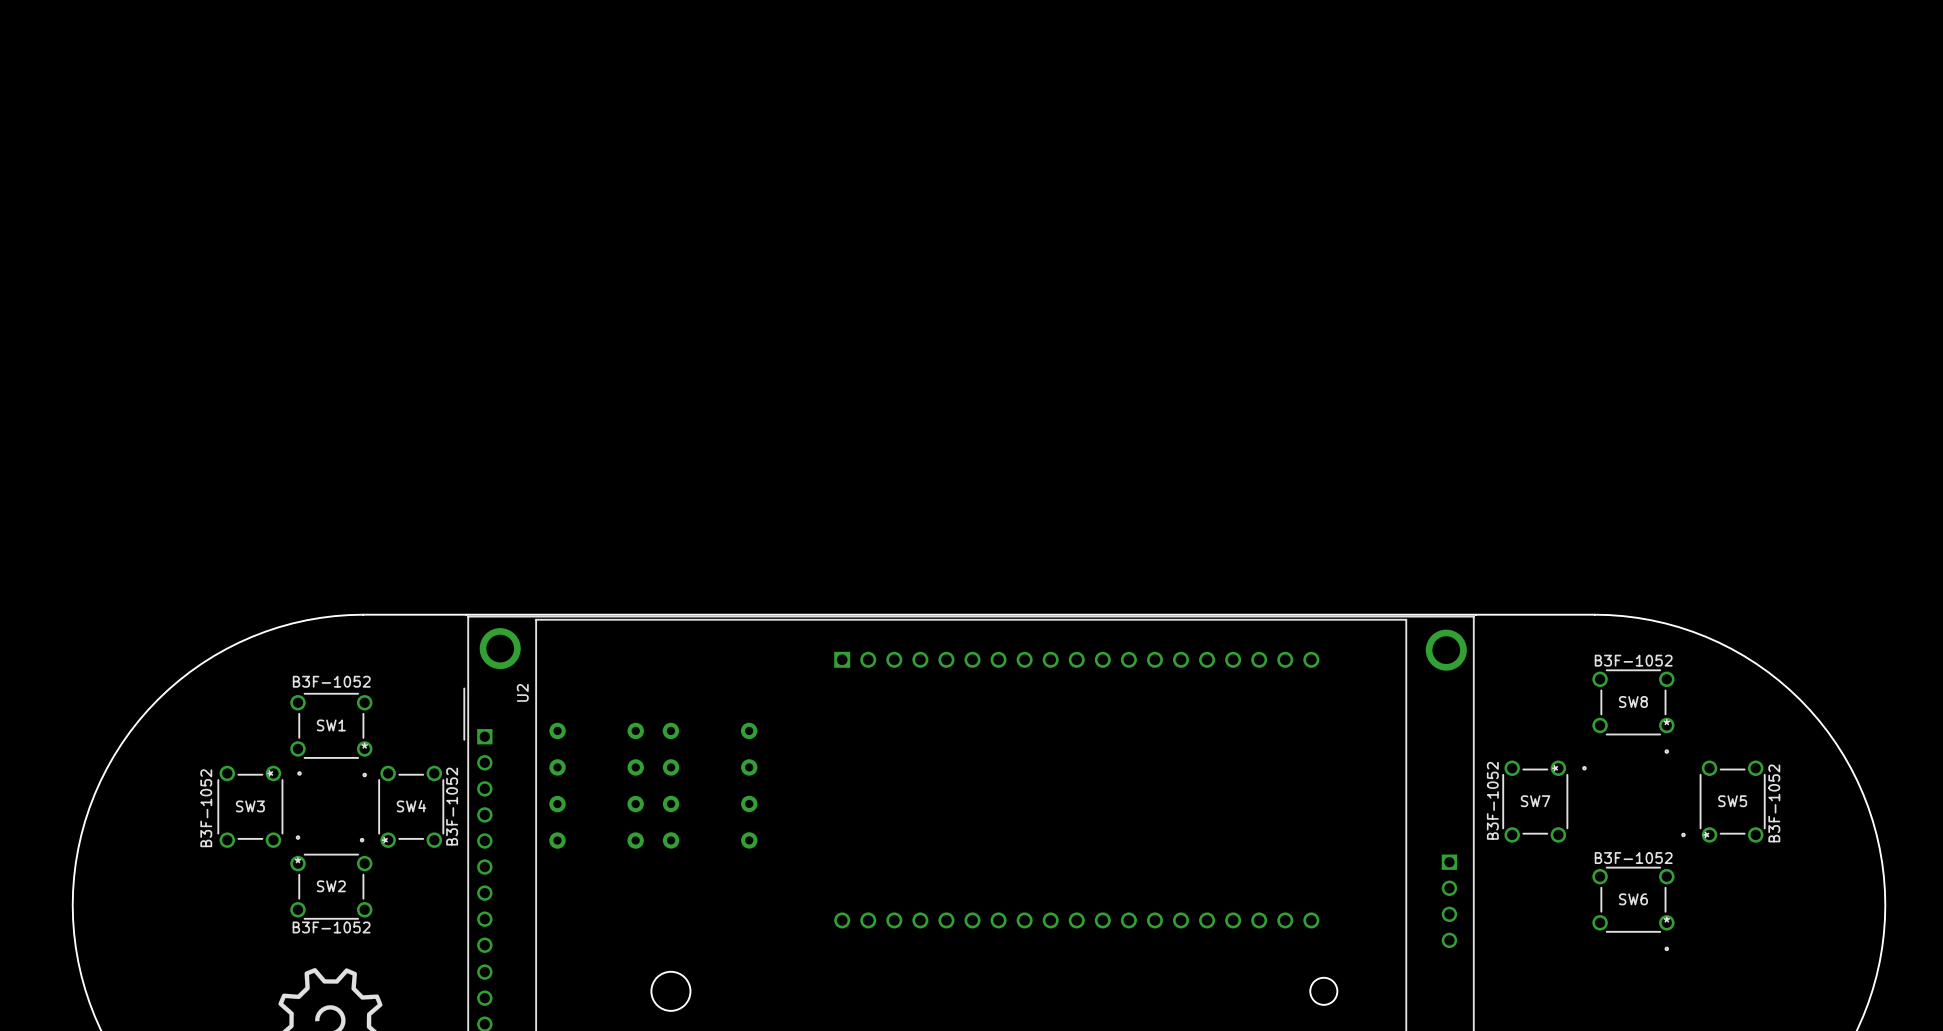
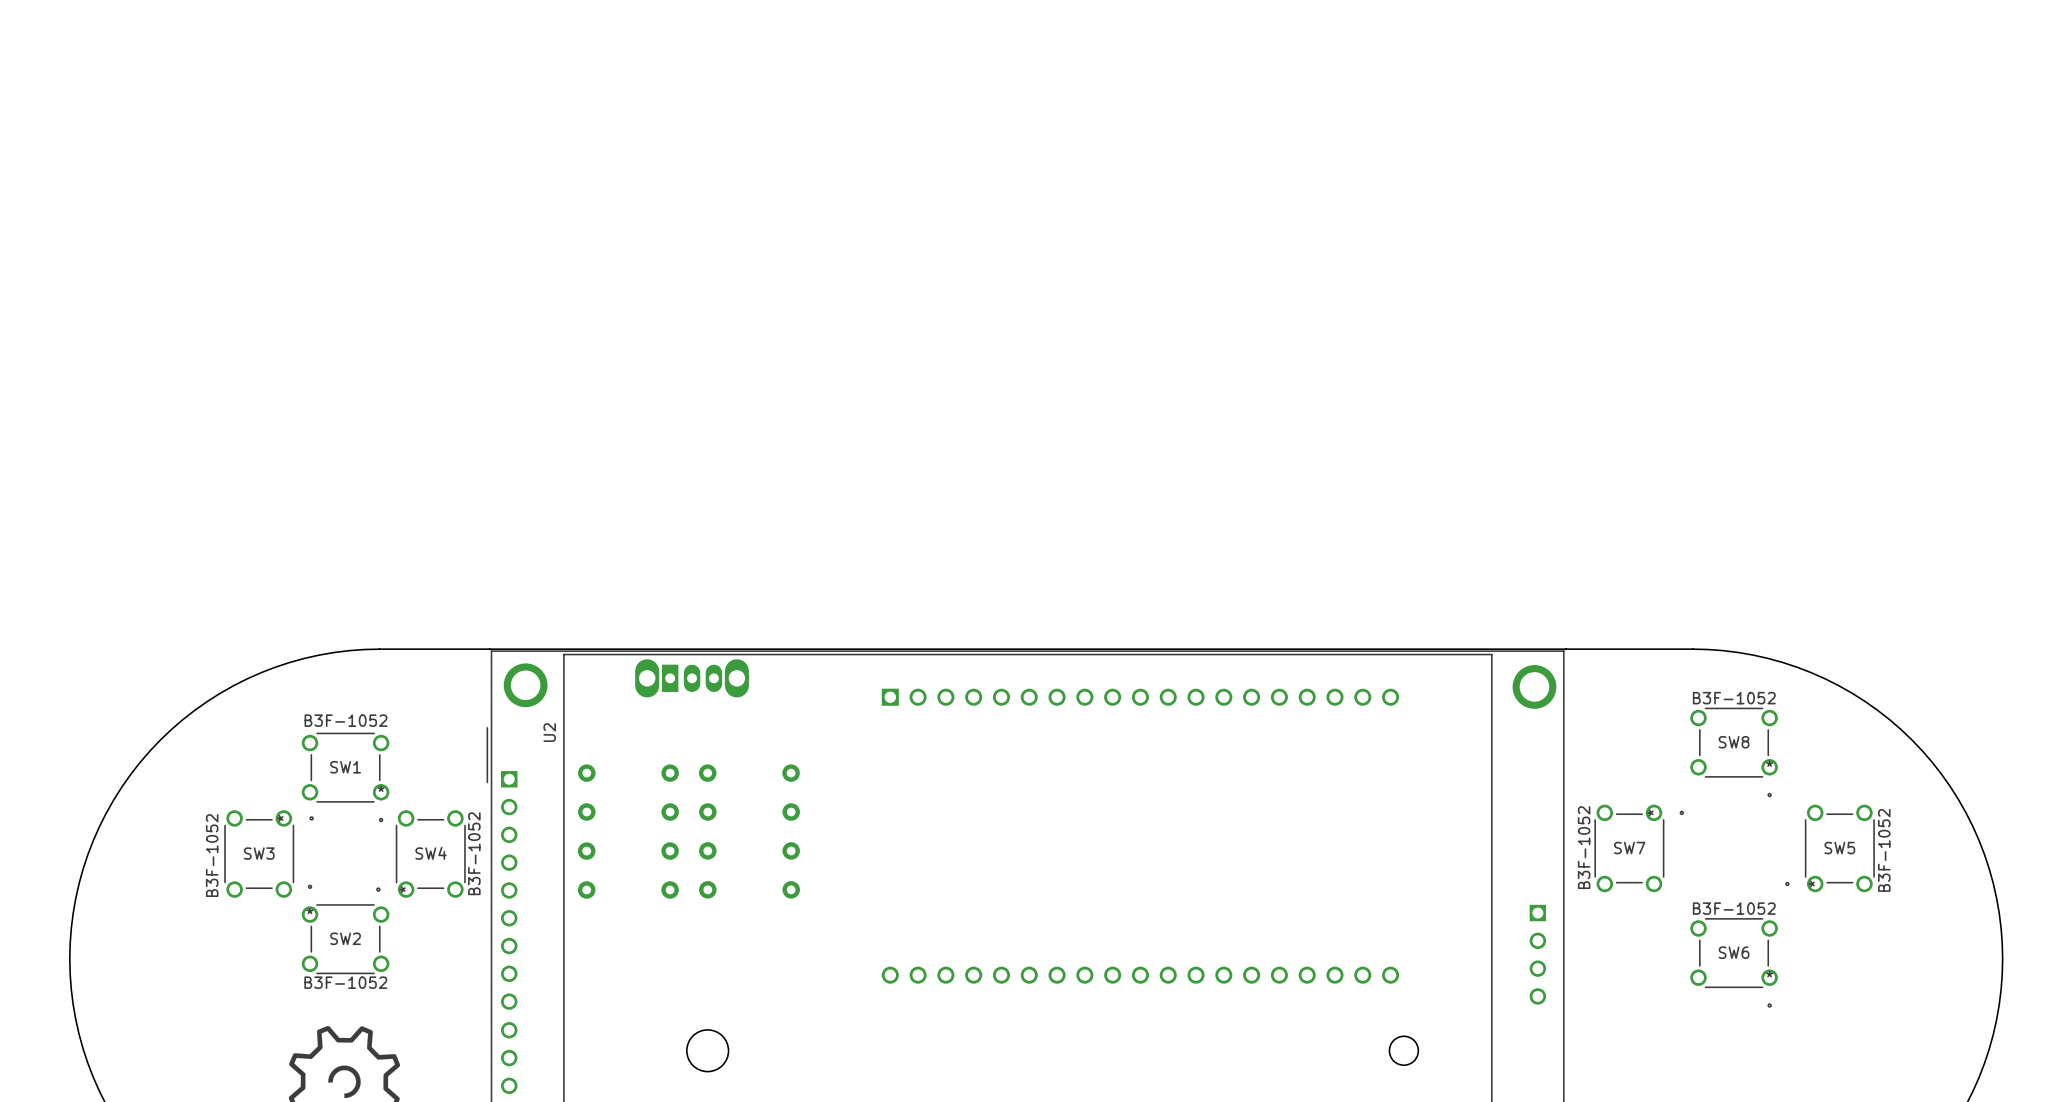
part: none -> (692, 678)

